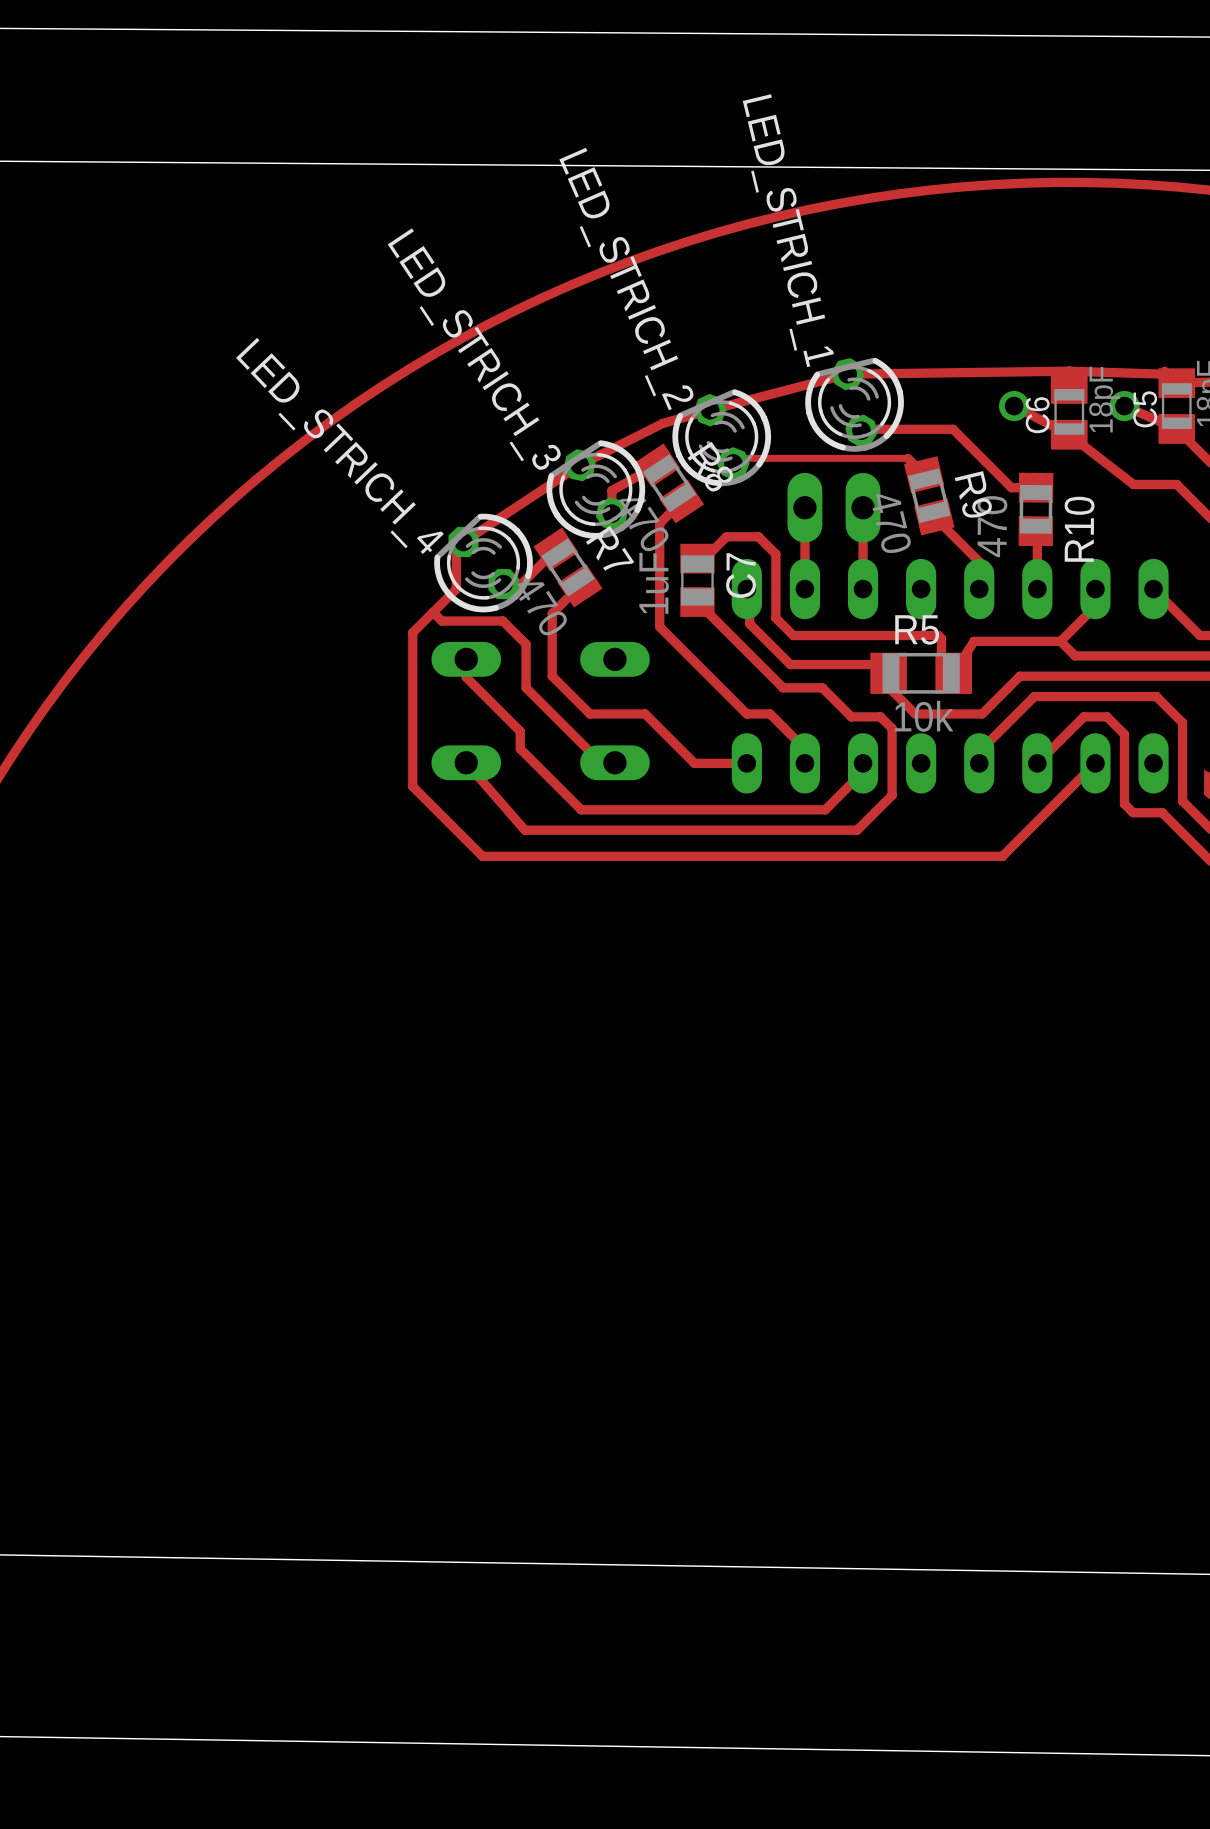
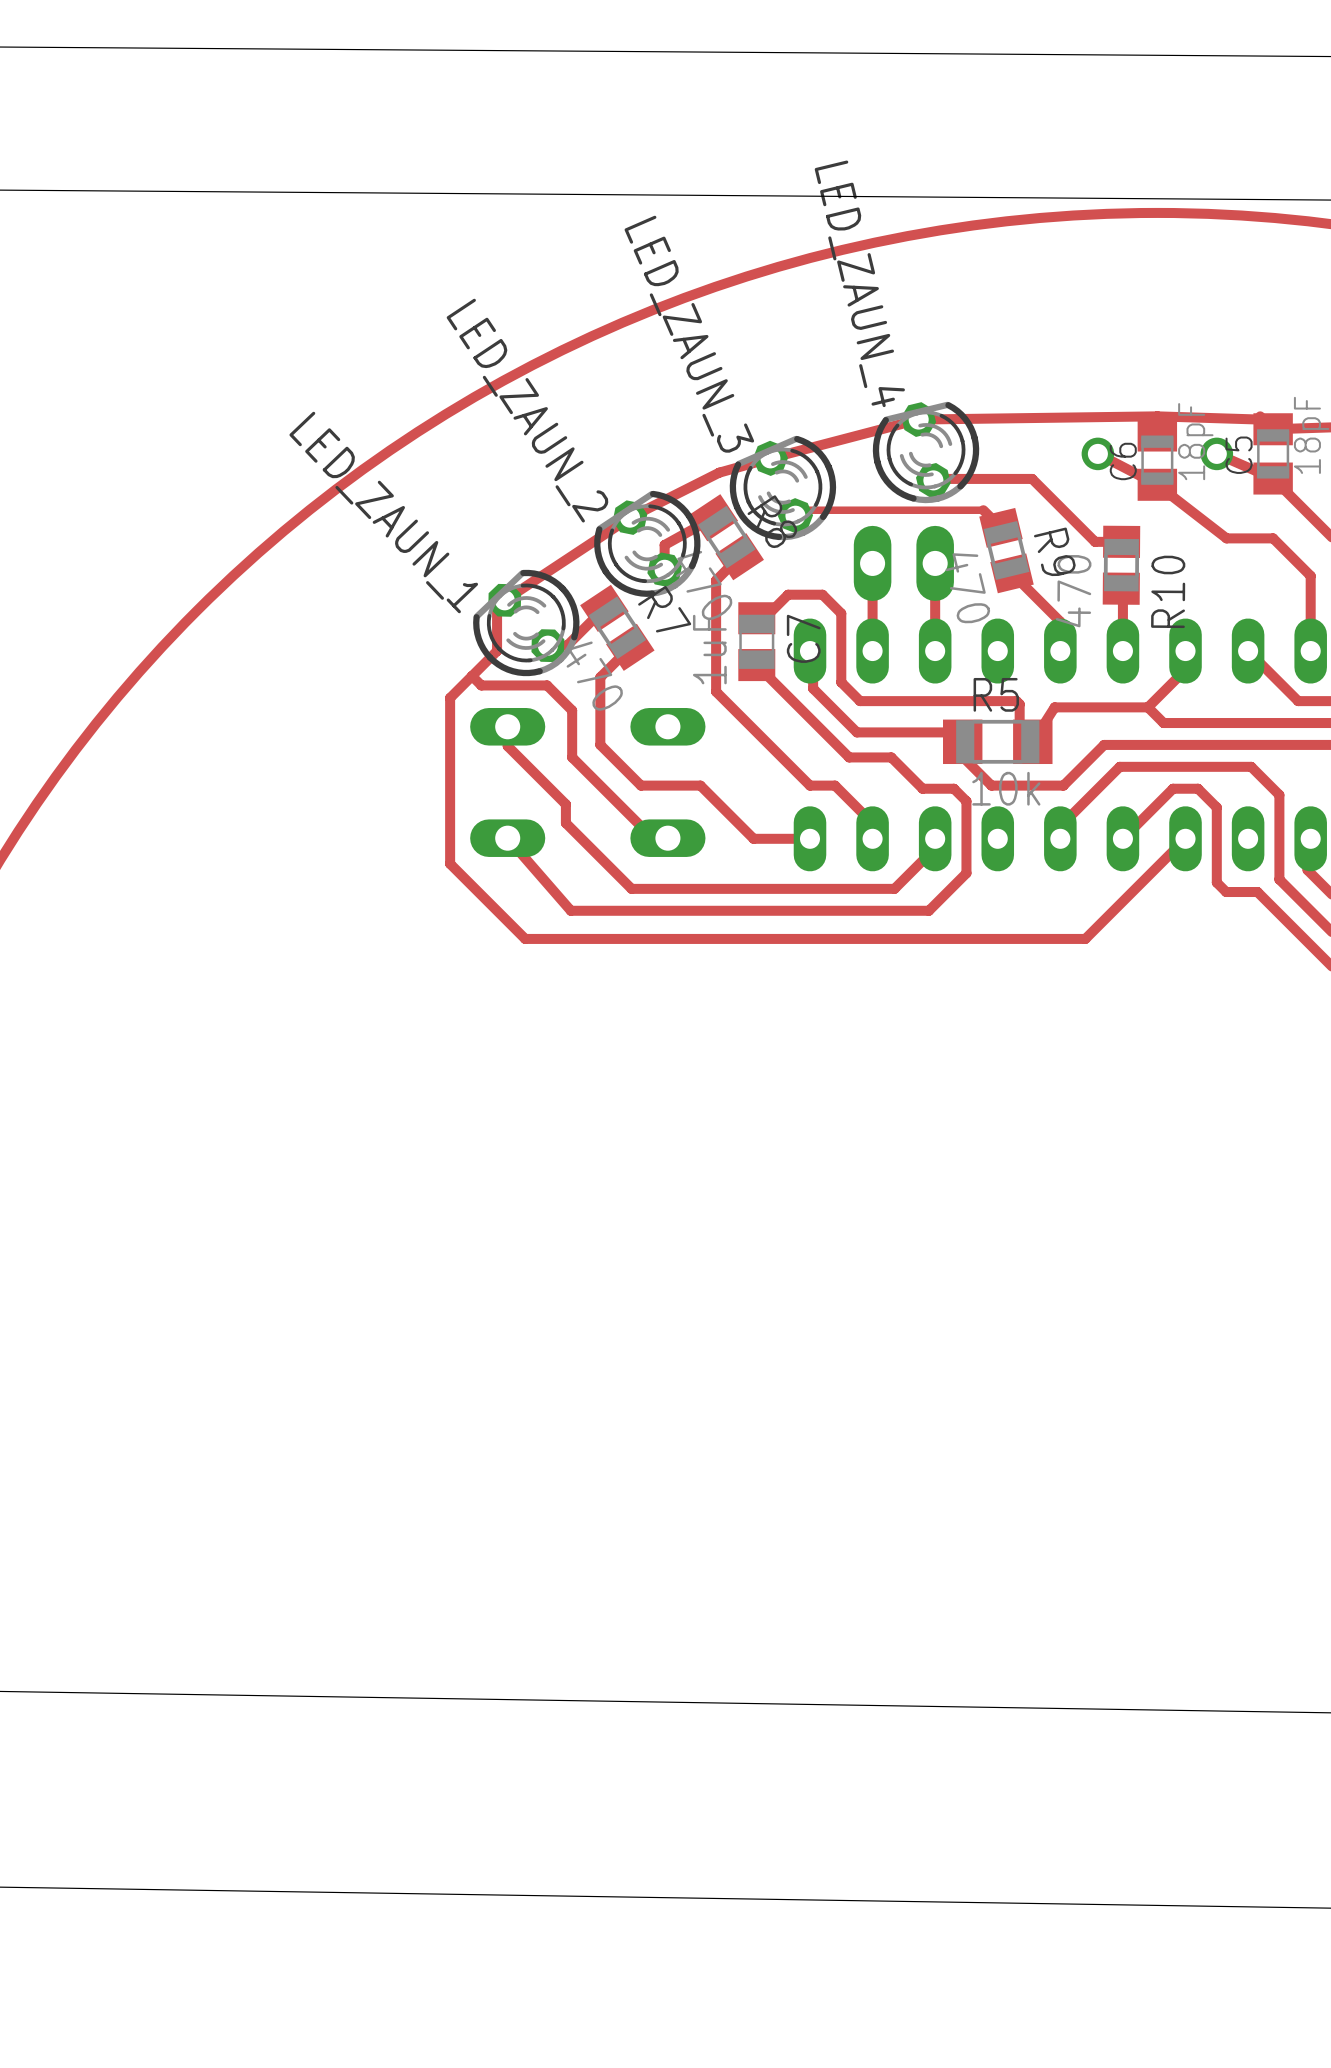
LED_STRICH_1 name: LED_STRICH_1 (788, 230) -> LED_ZAUN_4 (859, 283)
LED_STRICH_2 name: LED_STRICH_2 (626, 279) -> LED_ZAUN_3 (689, 334)
LED_STRICH_3 name: LED_STRICH_3 (474, 349) -> LED_ZAUN_2 (527, 410)
LED_STRICH_4 name: LED_STRICH_4 (339, 445) -> LED_ZAUN_1 (383, 512)

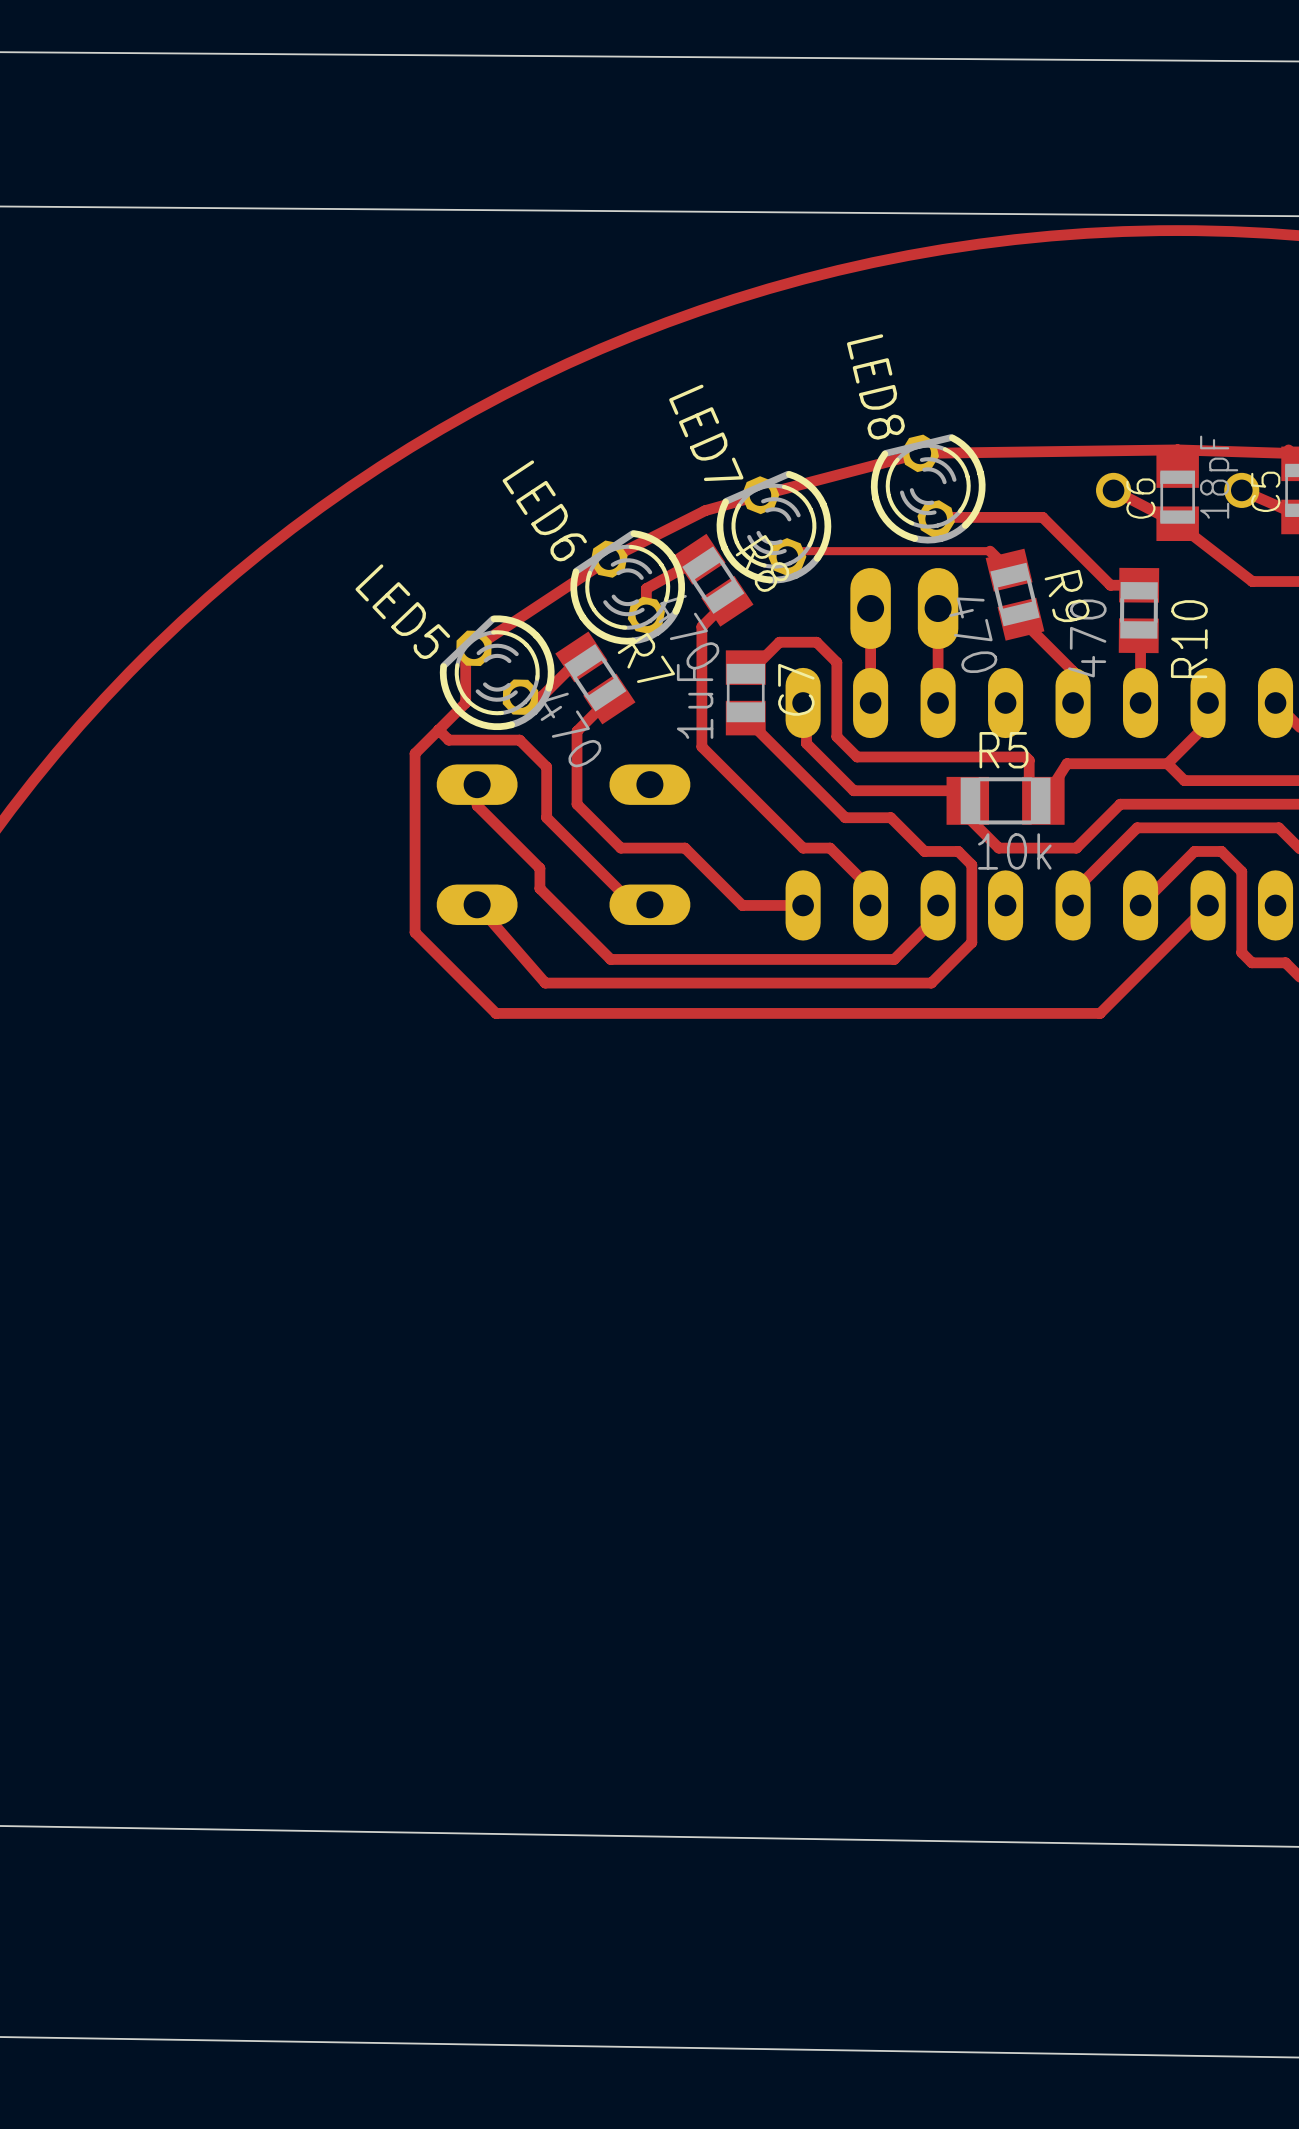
LED_ZAUN_4 name: LED_ZAUN_4 (859, 283) -> LED8 (875, 386)
LED_ZAUN_3 name: LED_ZAUN_3 (689, 334) -> LED7 (706, 432)
LED_ZAUN_2 name: LED_ZAUN_2 (527, 410) -> LED6 (544, 510)
LED_ZAUN_1 name: LED_ZAUN_1 (383, 512) -> LED5 (402, 611)

